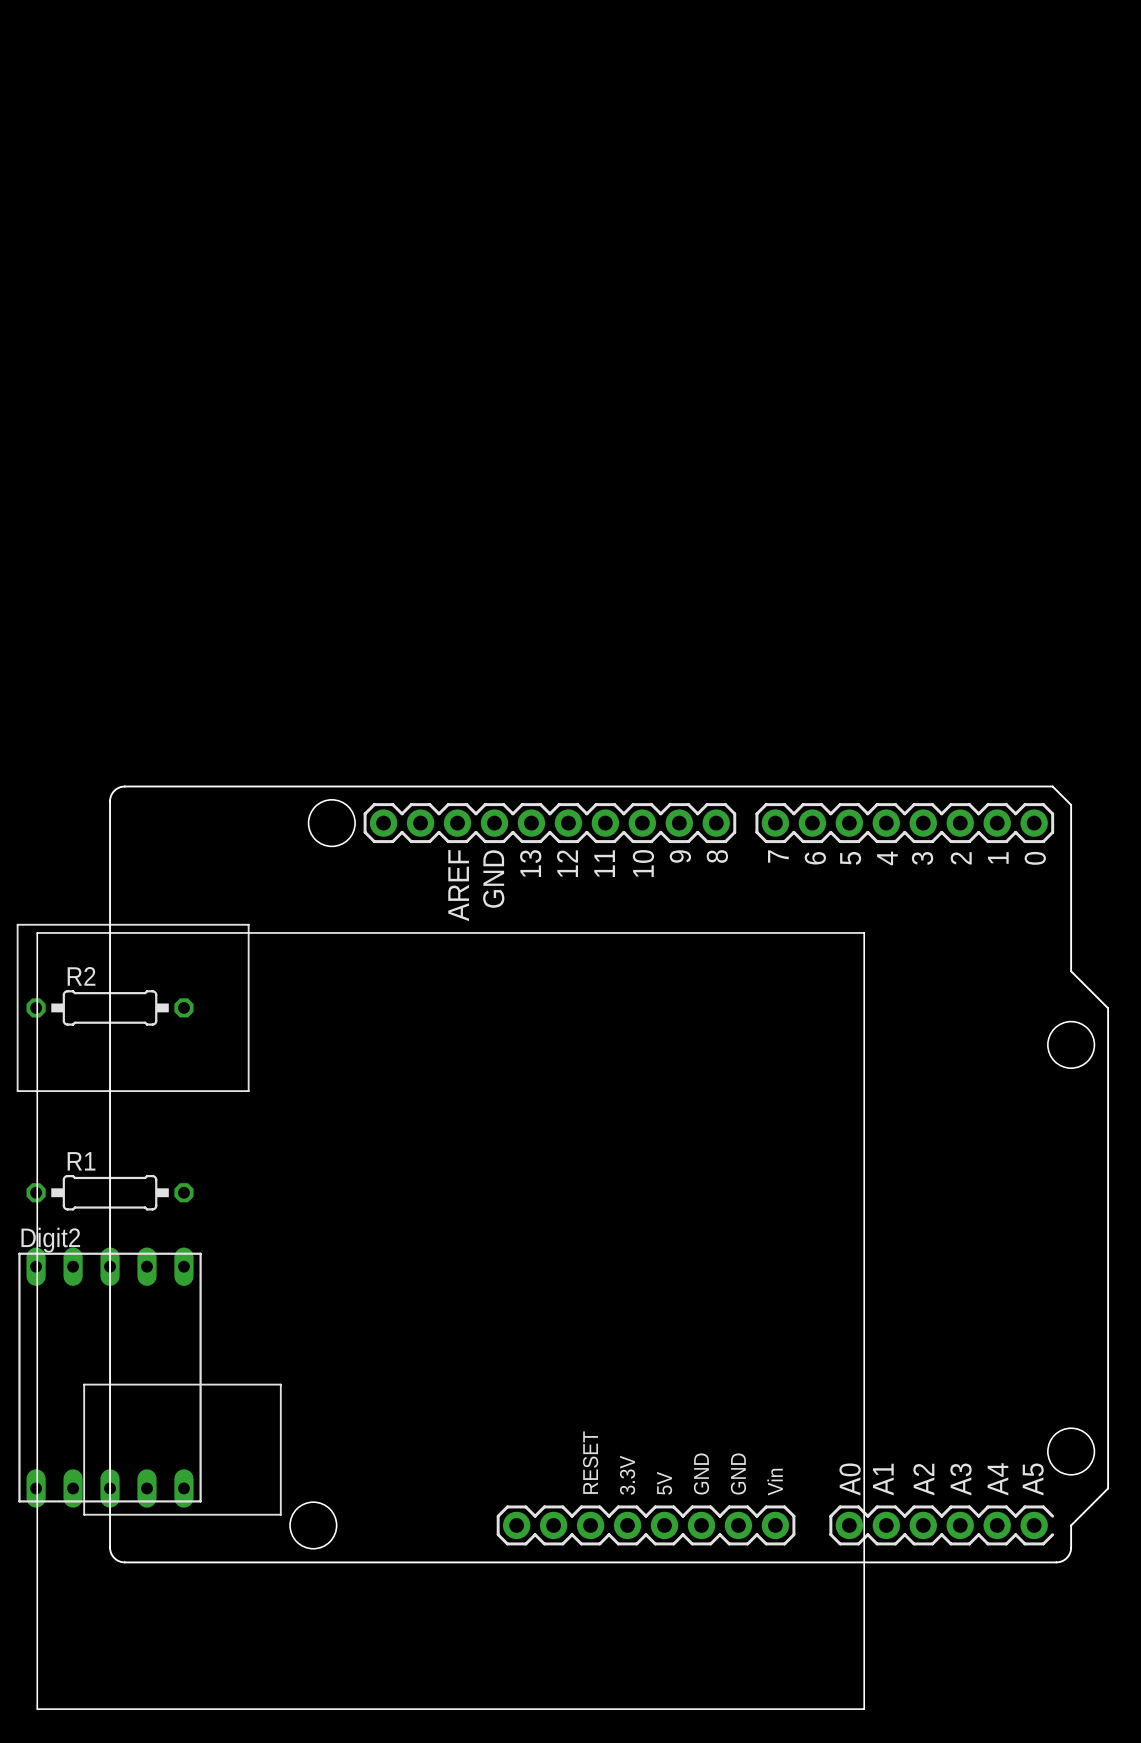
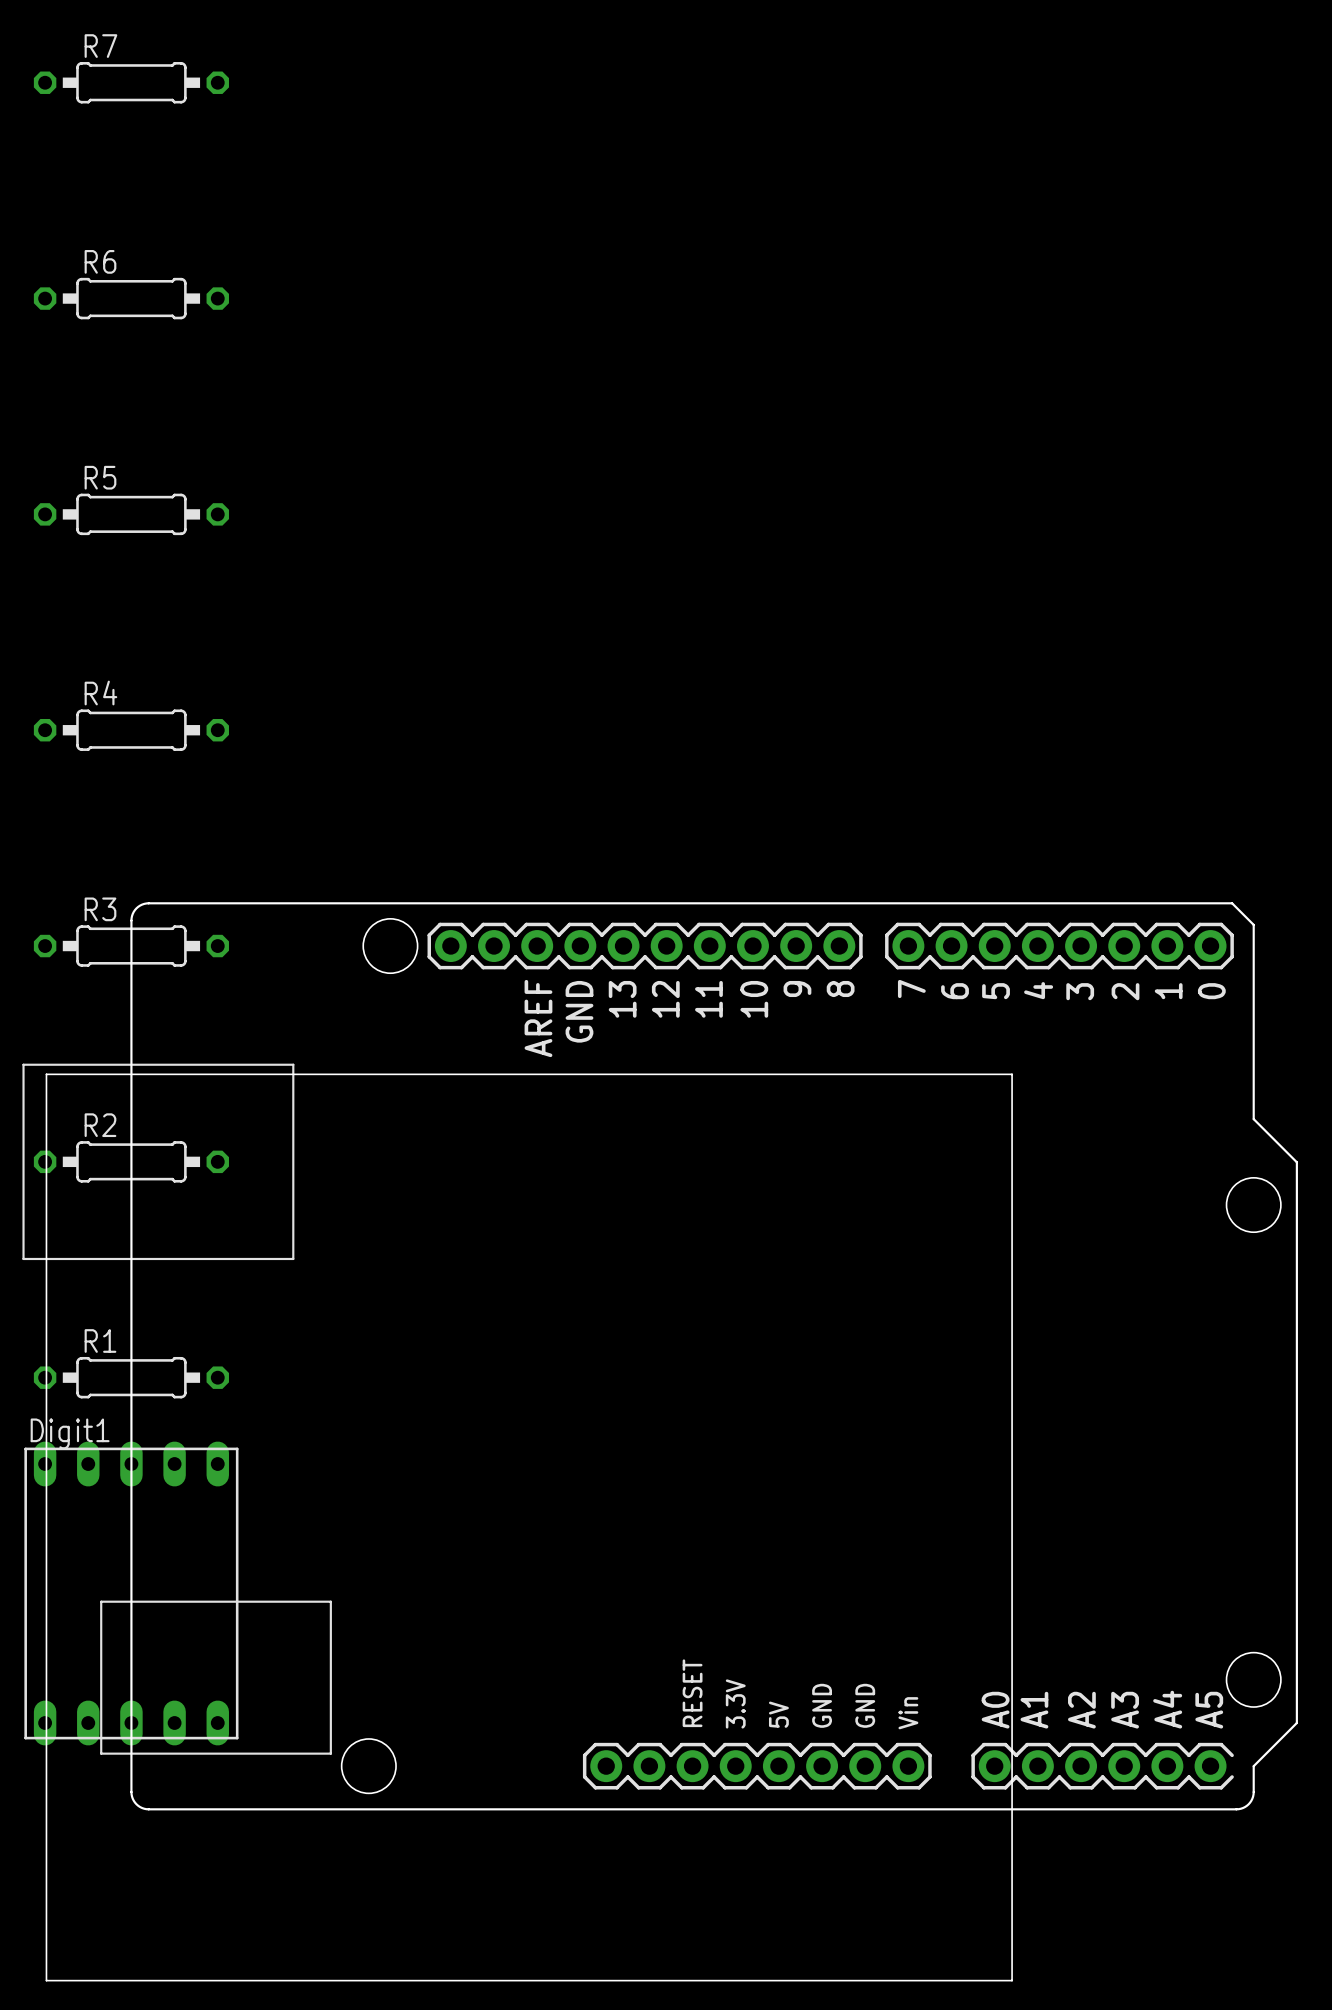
R7: none -> (131, 82)
R6: none -> (131, 298)
R5: none -> (131, 514)
R4: none -> (131, 730)
R3: none -> (131, 946)
Digit2 name: Digit2 (50, 1240) -> Digit1 (70, 1433)

